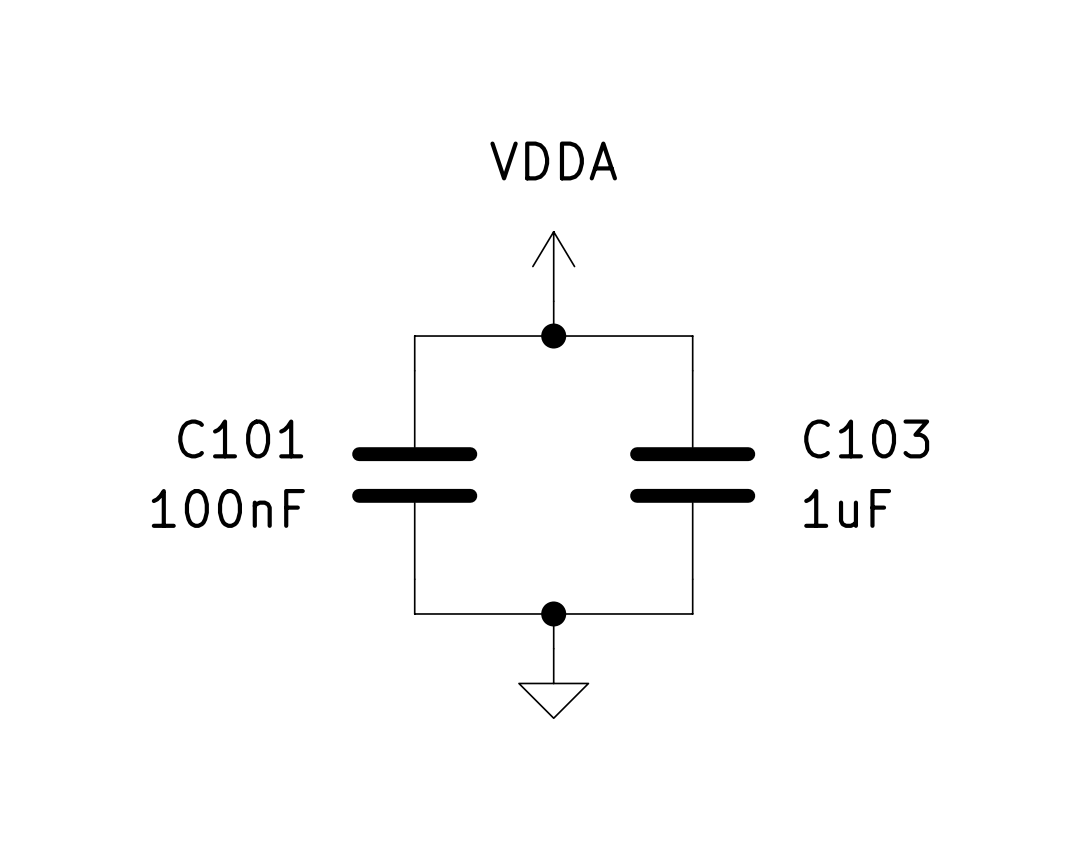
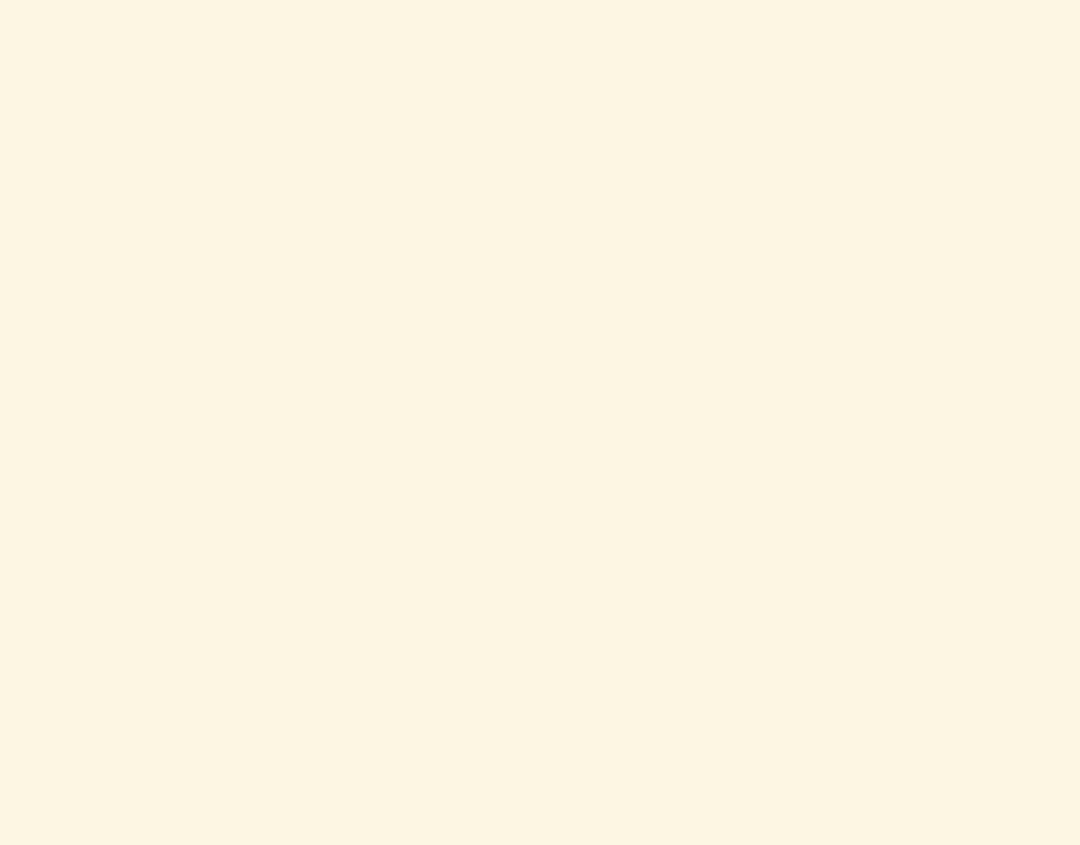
power symbol: VDDA (553, 266) -> none
wire: (553, 301) (553, 336) -> none
junction: (553, 336) -> none
wire: (414, 370) (414, 336) (692, 336) (692, 370) -> none
C101: 100nF (414, 475) -> none
C103: 1uF (692, 475) -> none
wire: (414, 579) (414, 613) (692, 613) (692, 579) -> none
wire: (553, 613) (553, 648) -> none
junction: (553, 613) -> none
power symbol: (553, 683) -> none

